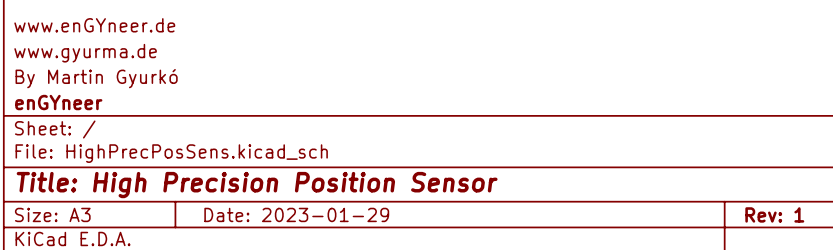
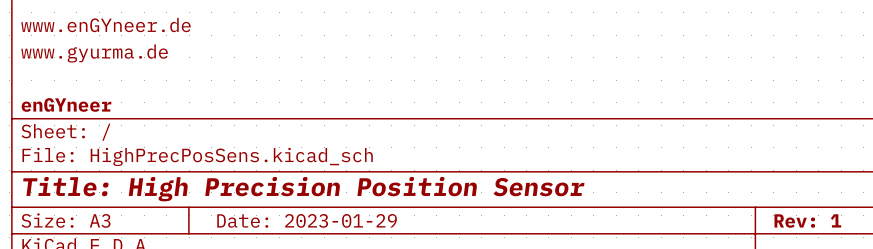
title block: By Martin Gyurkó (96, 78) -> none

